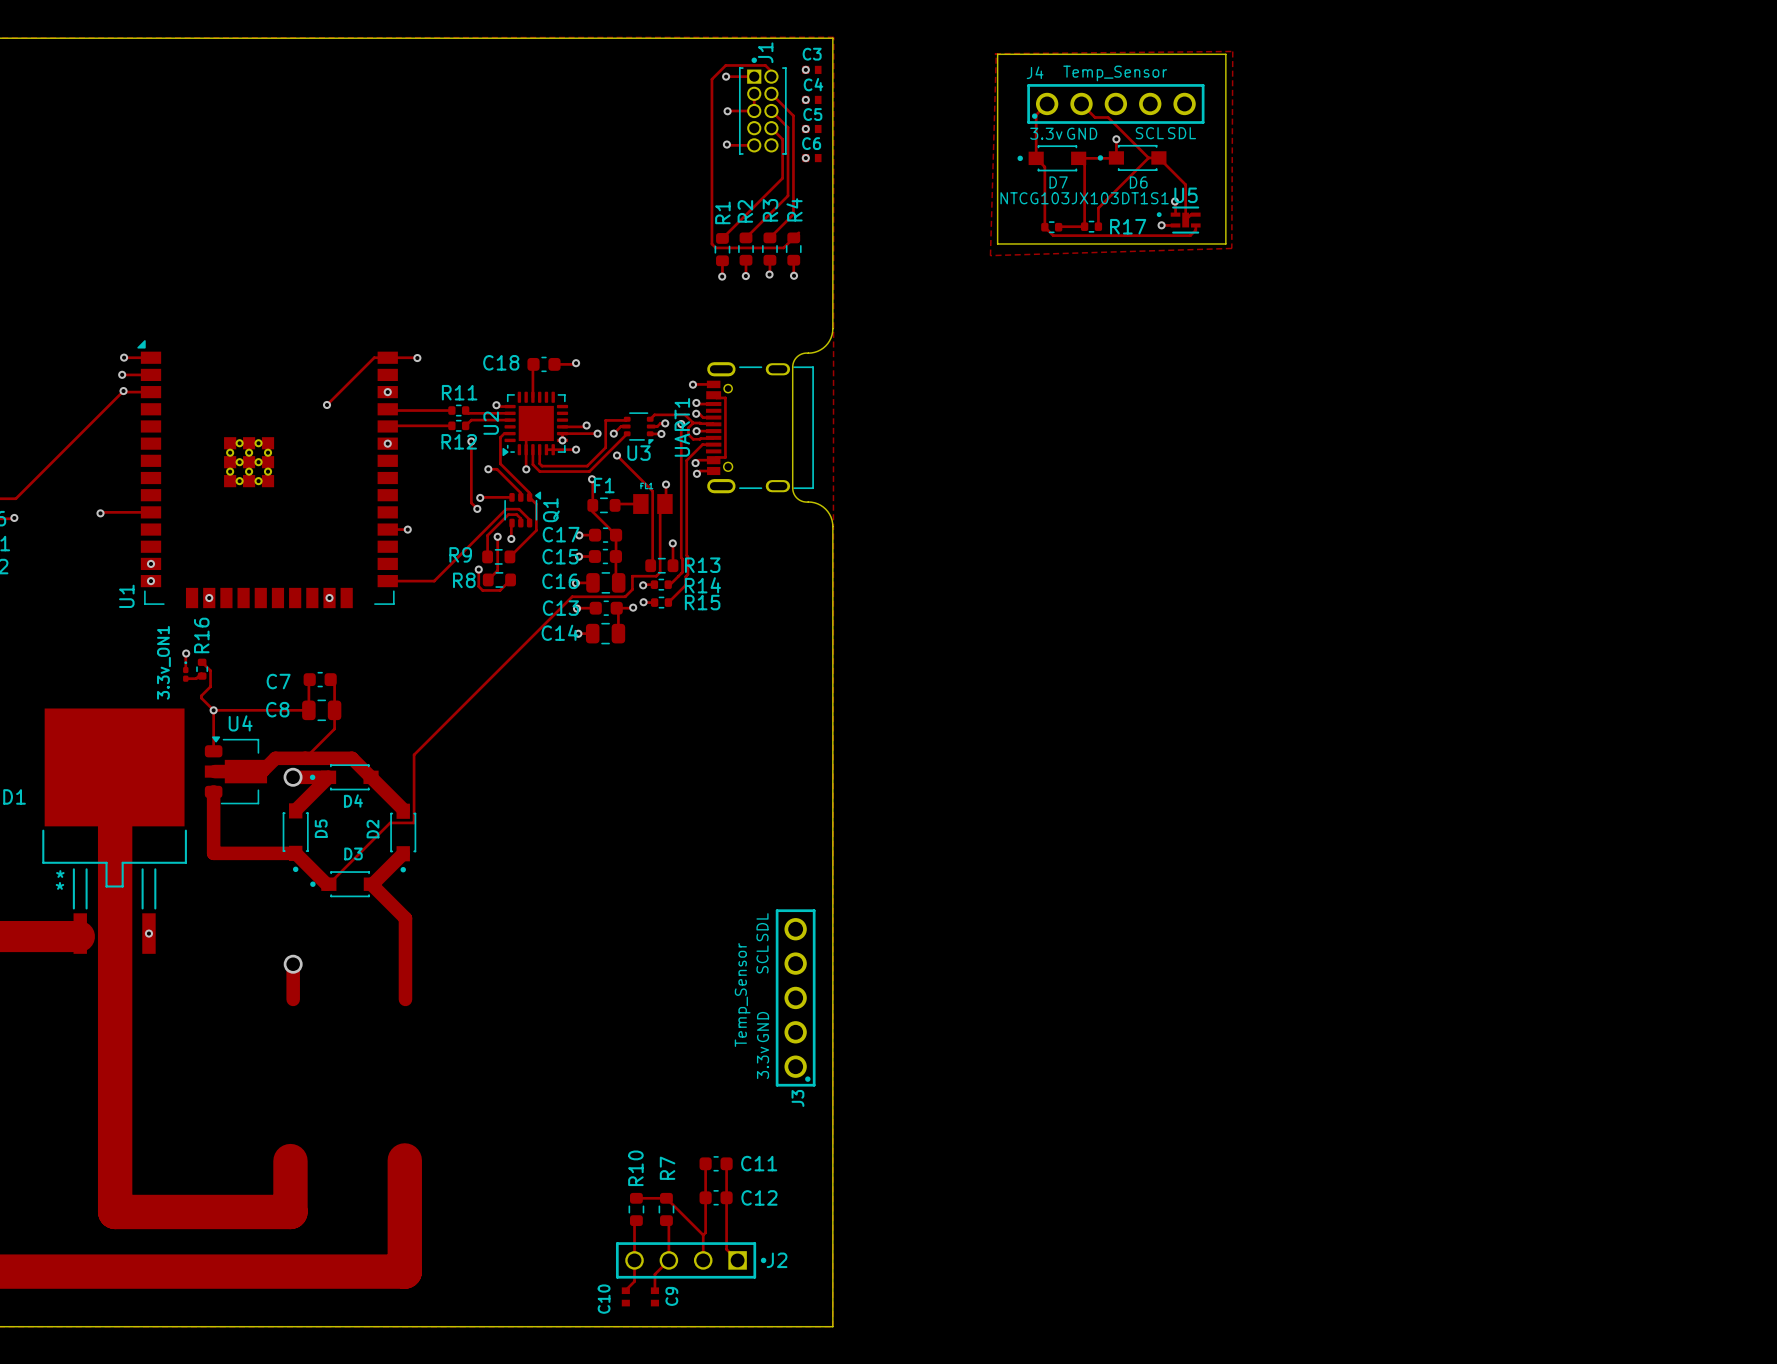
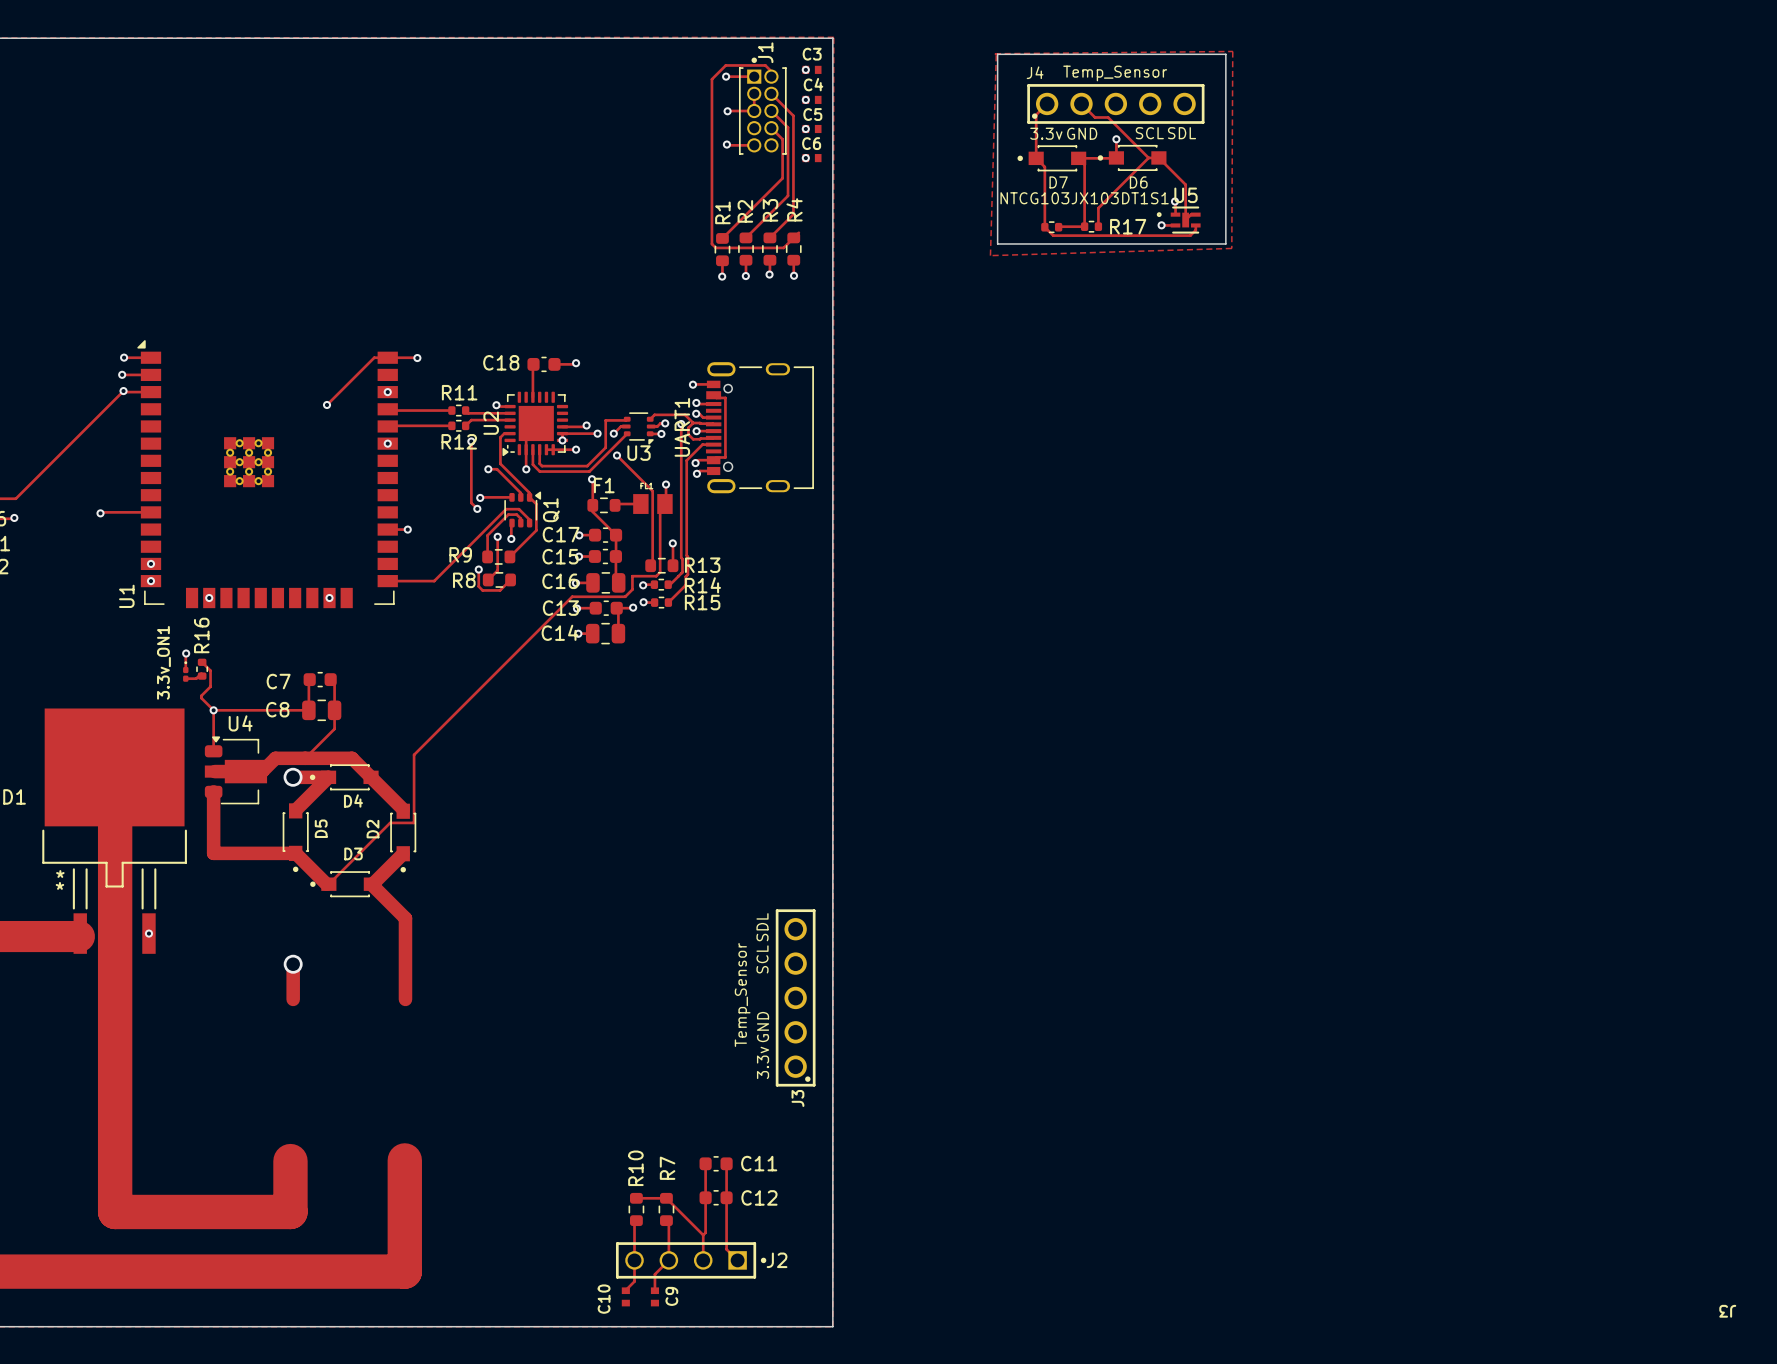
board edge: (832, 328) (830, 338) (825, 345) (817, 351) (798, 355) (794, 360) (792, 367) (793, 491) (800, 500) (817, 503) (825, 509) (830, 517) (832, 526) -> (832, 328) (832, 526)
text: none -> J3 (1727, 1311)

